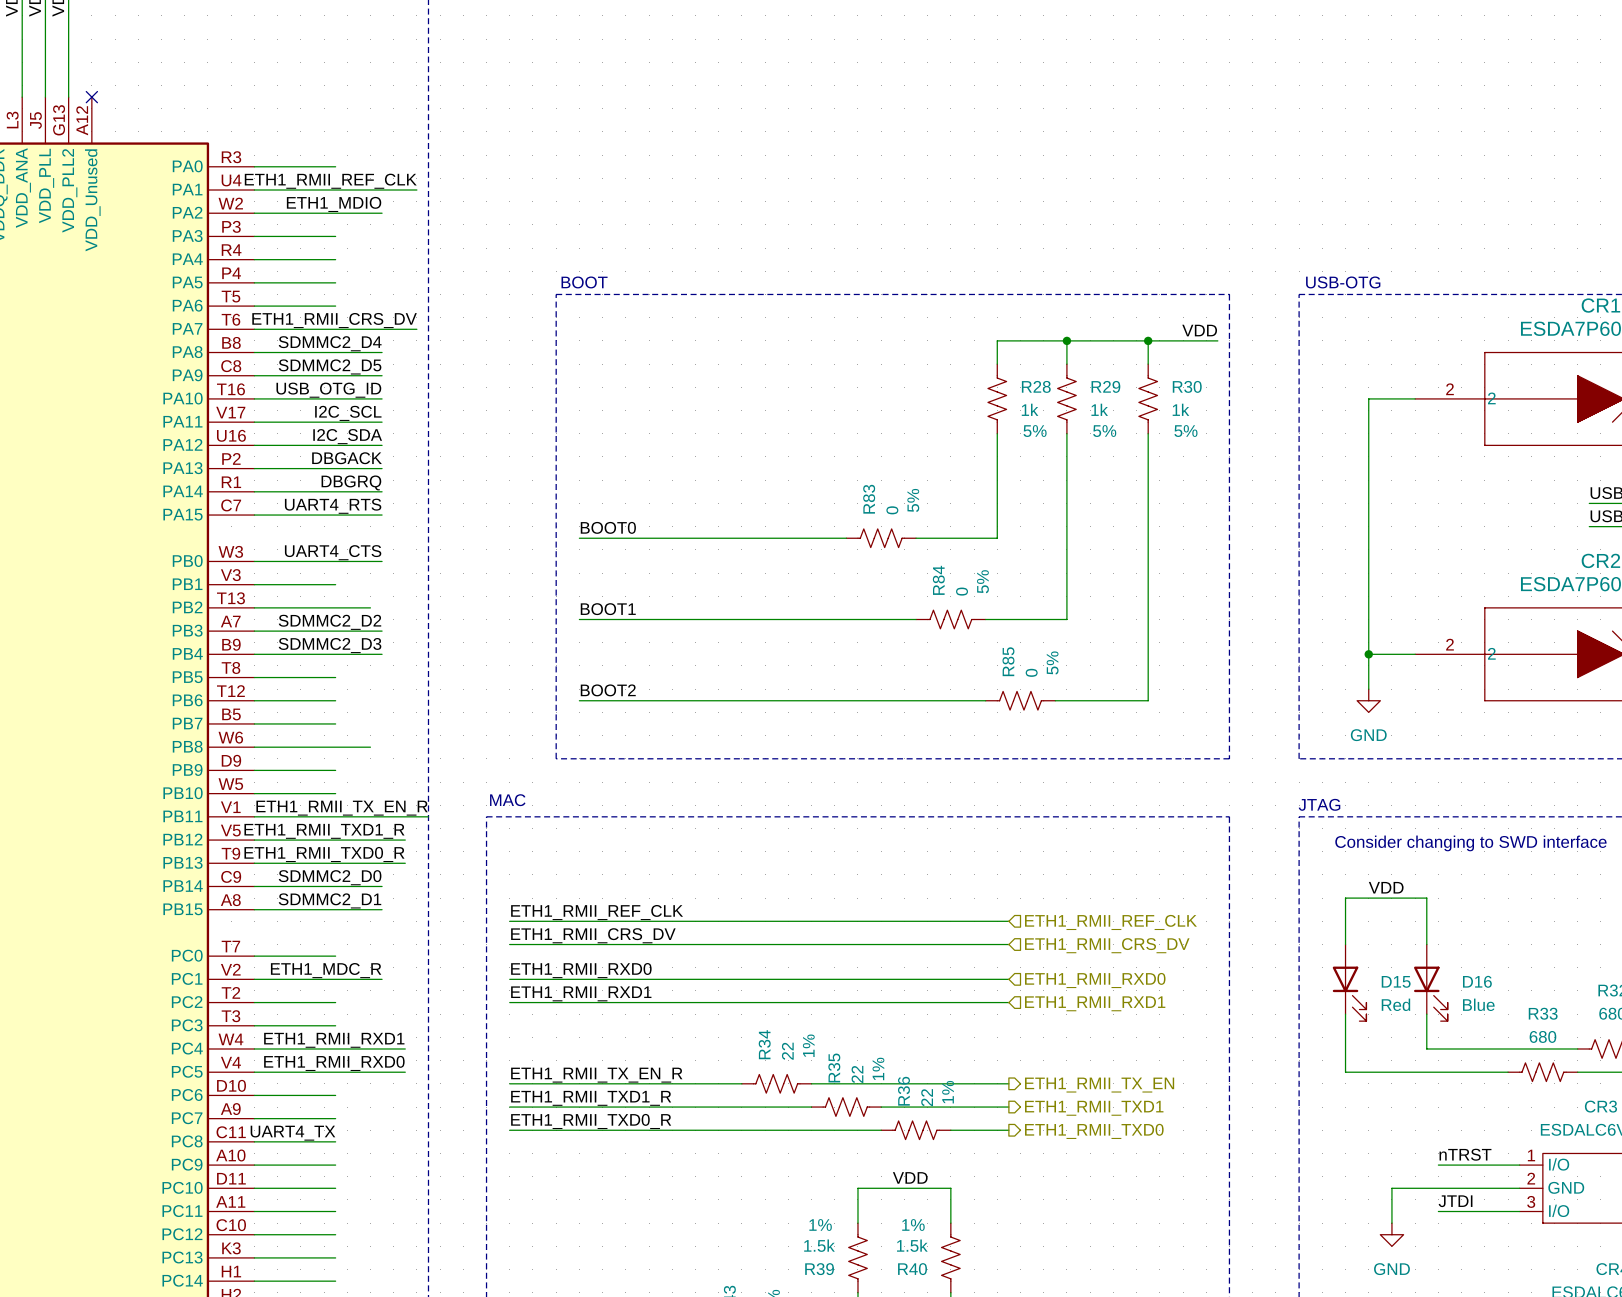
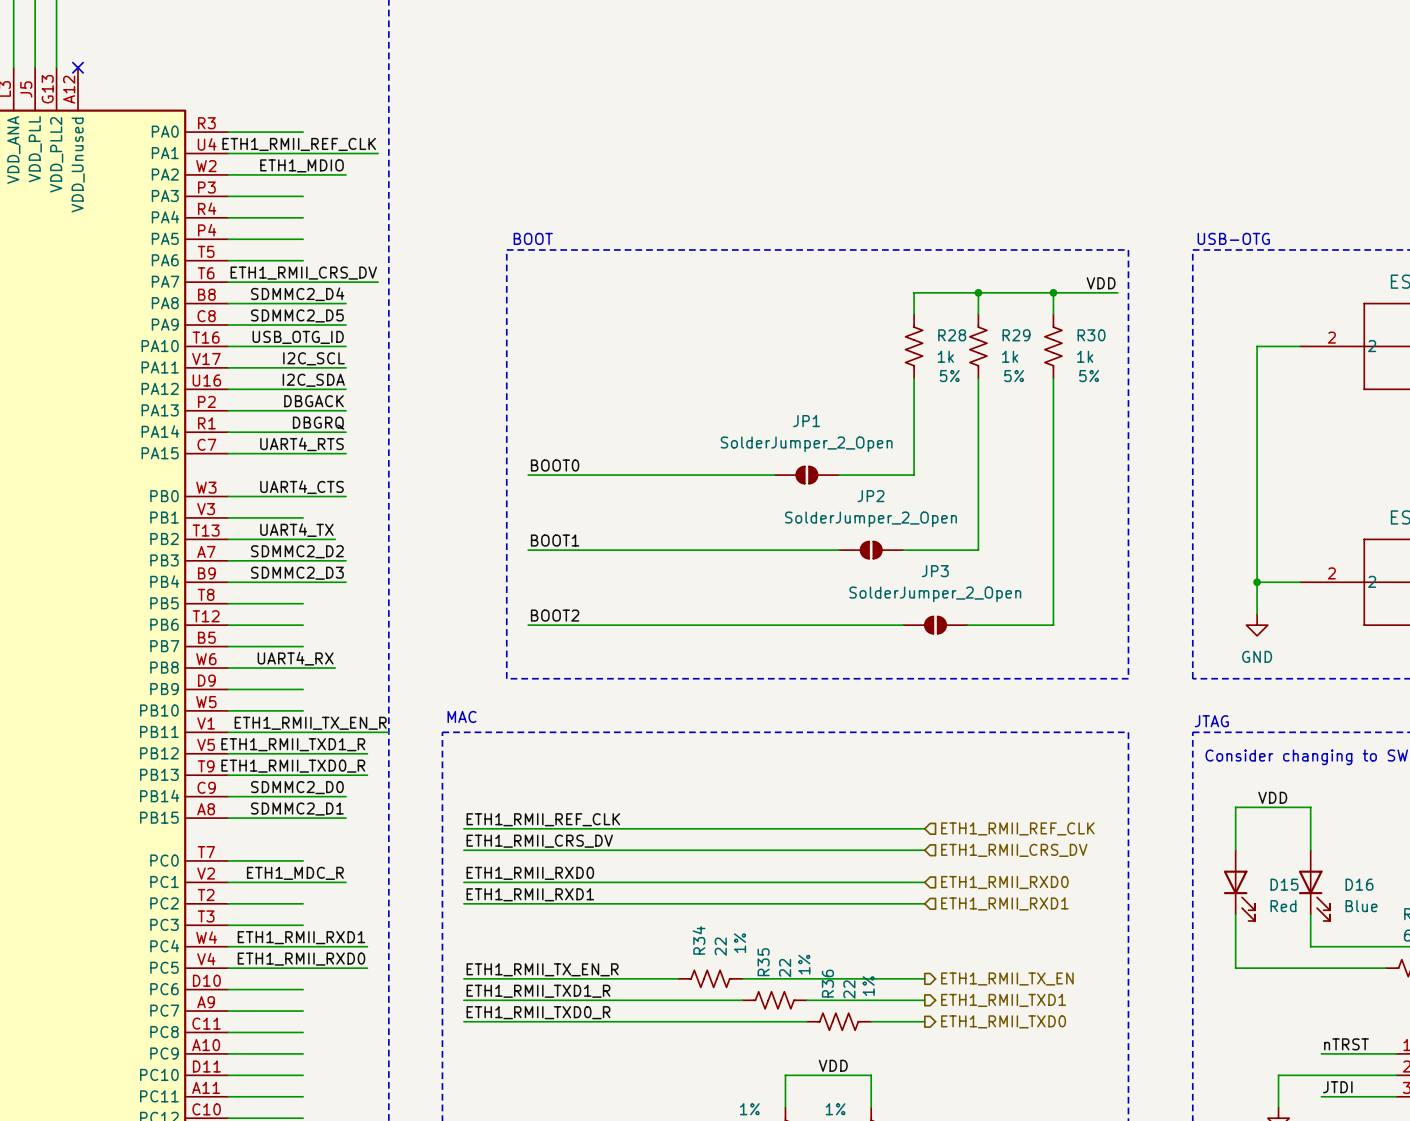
R83: 0 (881, 538) -> none
JP1: none -> SolderJumper_2_Open (806, 475)
label: none -> UART4_TX (296, 530)
R84: 0 (950, 619) -> none
JP2: none -> SolderJumper_2_Open (871, 550)
R85: 0 (1020, 700) -> none
JP3: none -> SolderJumper_2_Open (935, 625)
label: none -> UART4_RX (295, 658)
label: UART4_TX (292, 1133) -> none

